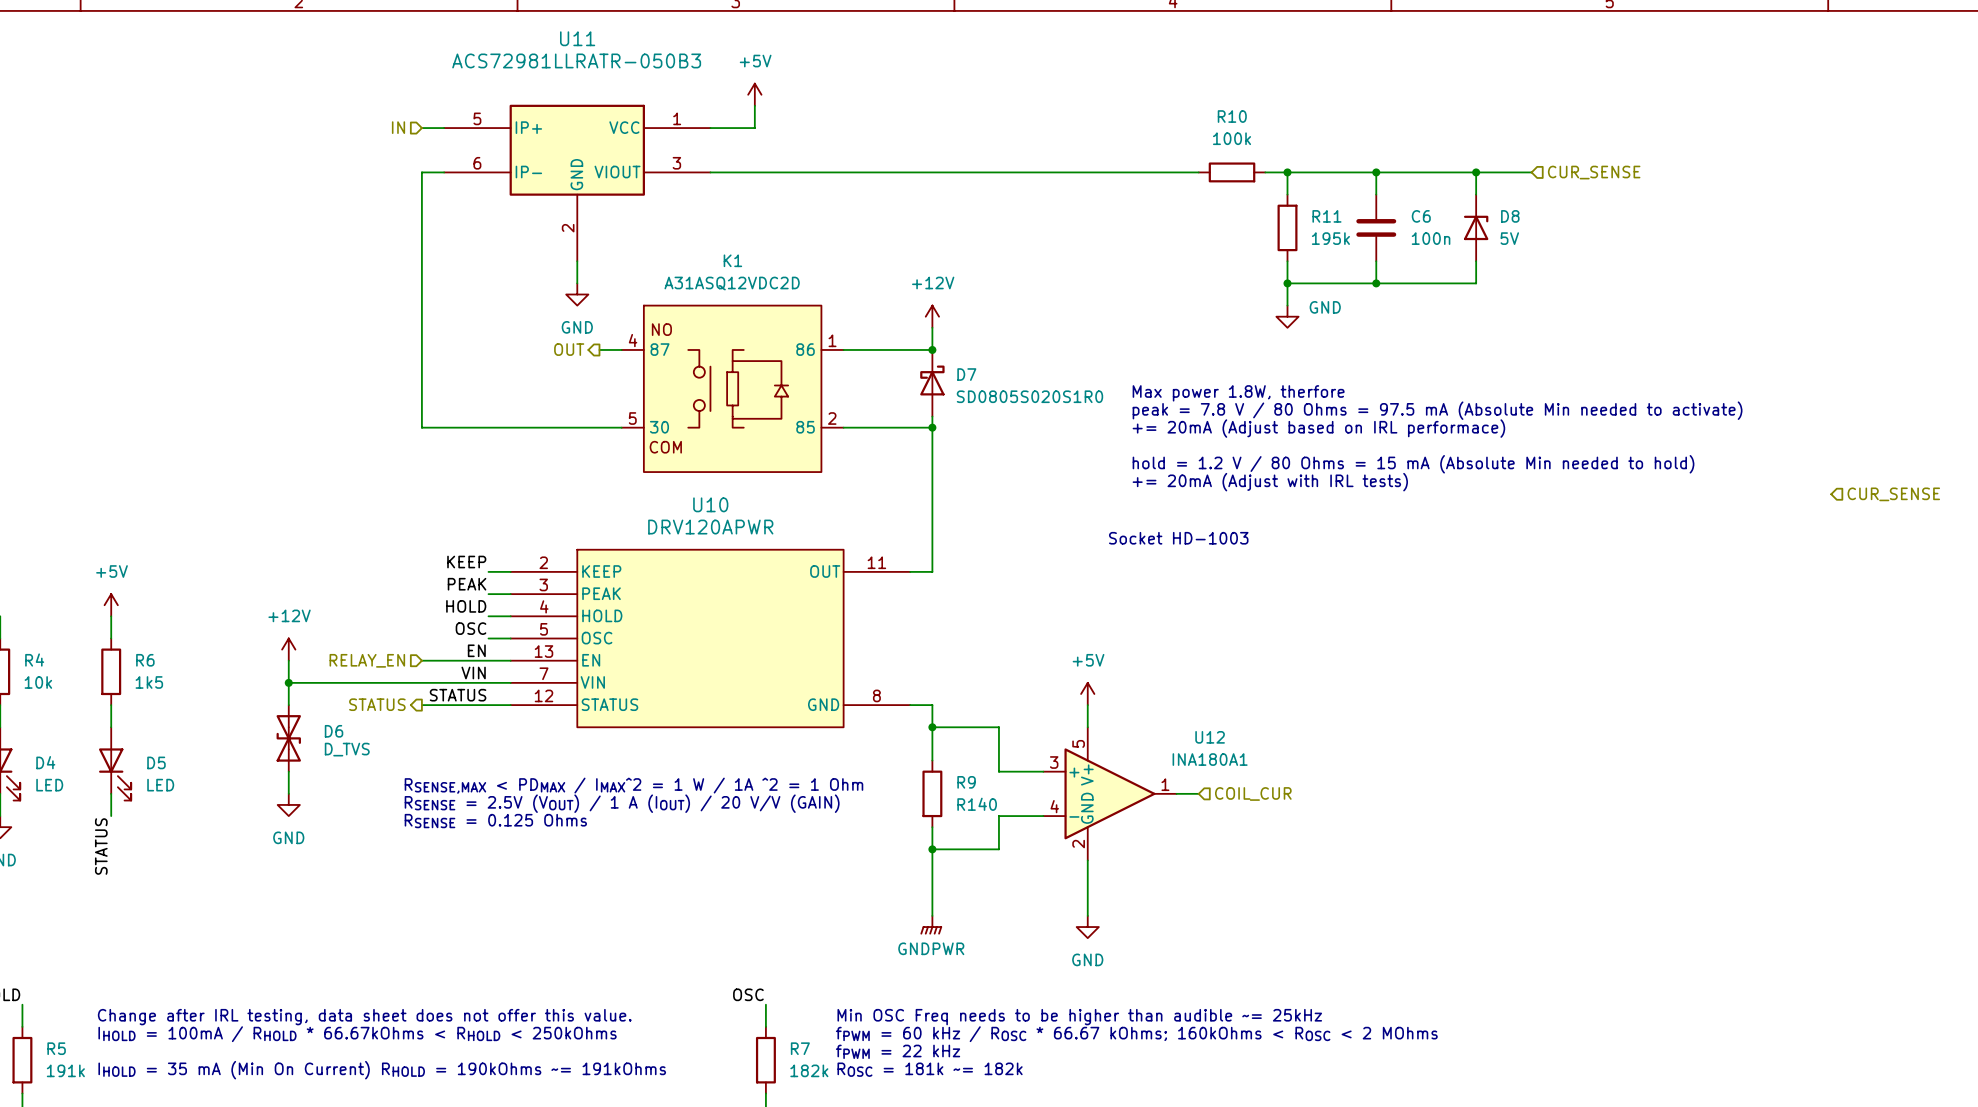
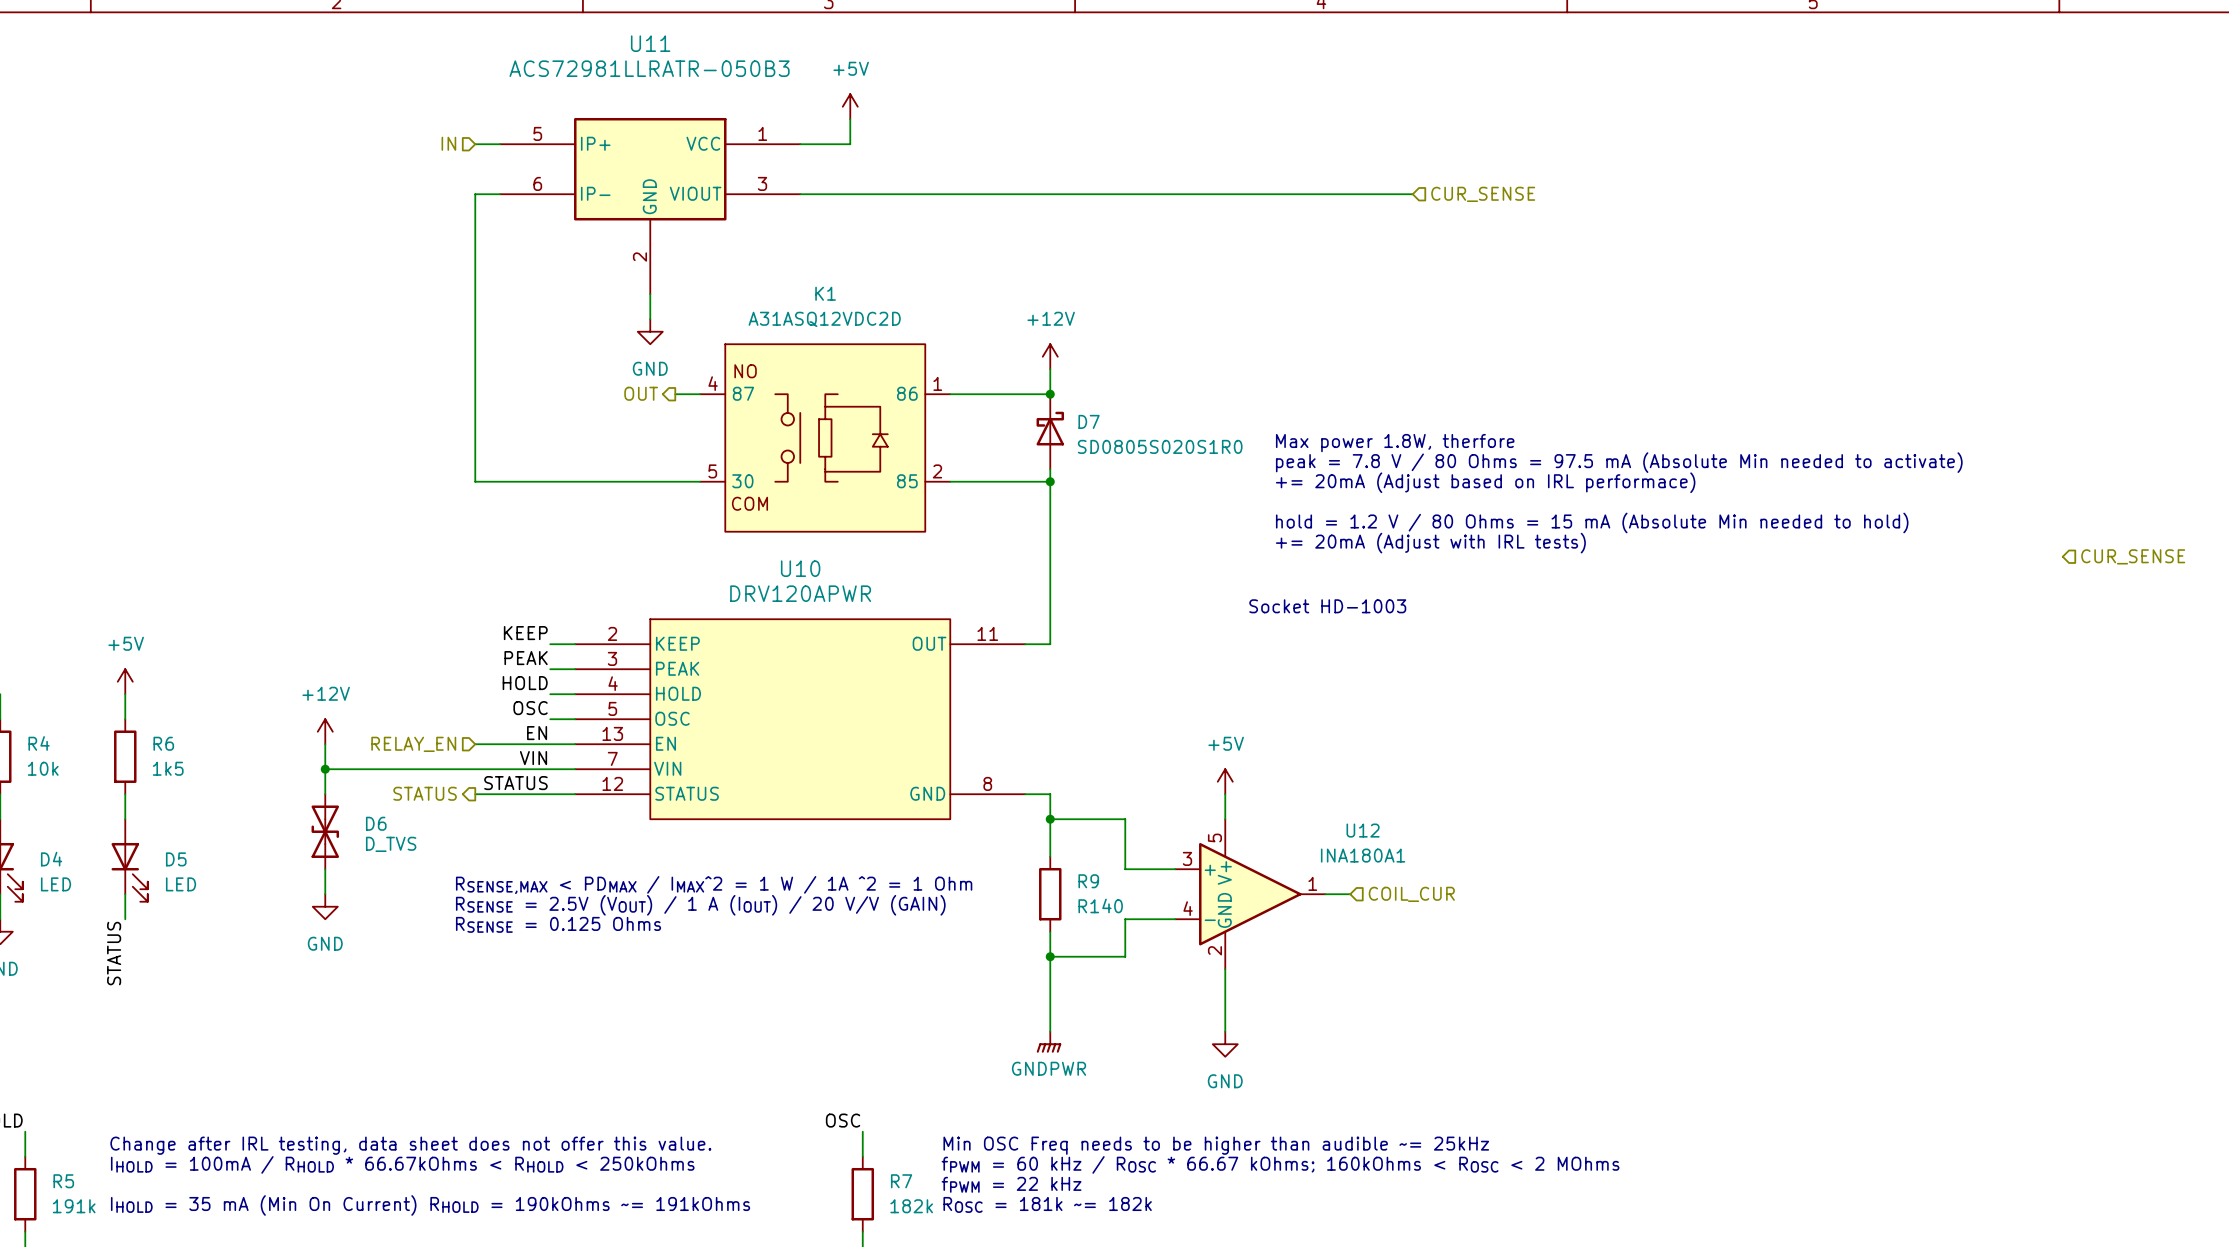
wire: none -> (1350, 194) (1412, 194)
R10: 100k (1232, 172) -> none
wire: (1265, 172) (1531, 172) -> none
wire: (1287, 172) (1287, 194) -> none
junction: (1287, 172) -> none
hierarchical label: none -> CUR_SENSE (1483, 194)
wire: (1376, 172) (1376, 194) -> none
junction: (1376, 172) -> none
wire: (1476, 172) (1476, 194) -> none
junction: (1476, 172) -> none
hierarchical label: CUR_SENSE (1594, 172) -> none
R11: 195k (1287, 227) -> none
C6: 100n (1376, 227) -> none
D8: 5V (1476, 227) -> none
wire: (1287, 261) (1287, 305) -> none
wire: (1376, 261) (1376, 283) -> none
wire: (1476, 261) (1476, 283) (1287, 283) -> none
junction: (1287, 283) -> none
junction: (1376, 283) -> none
power symbol: GND (1287, 316) -> none

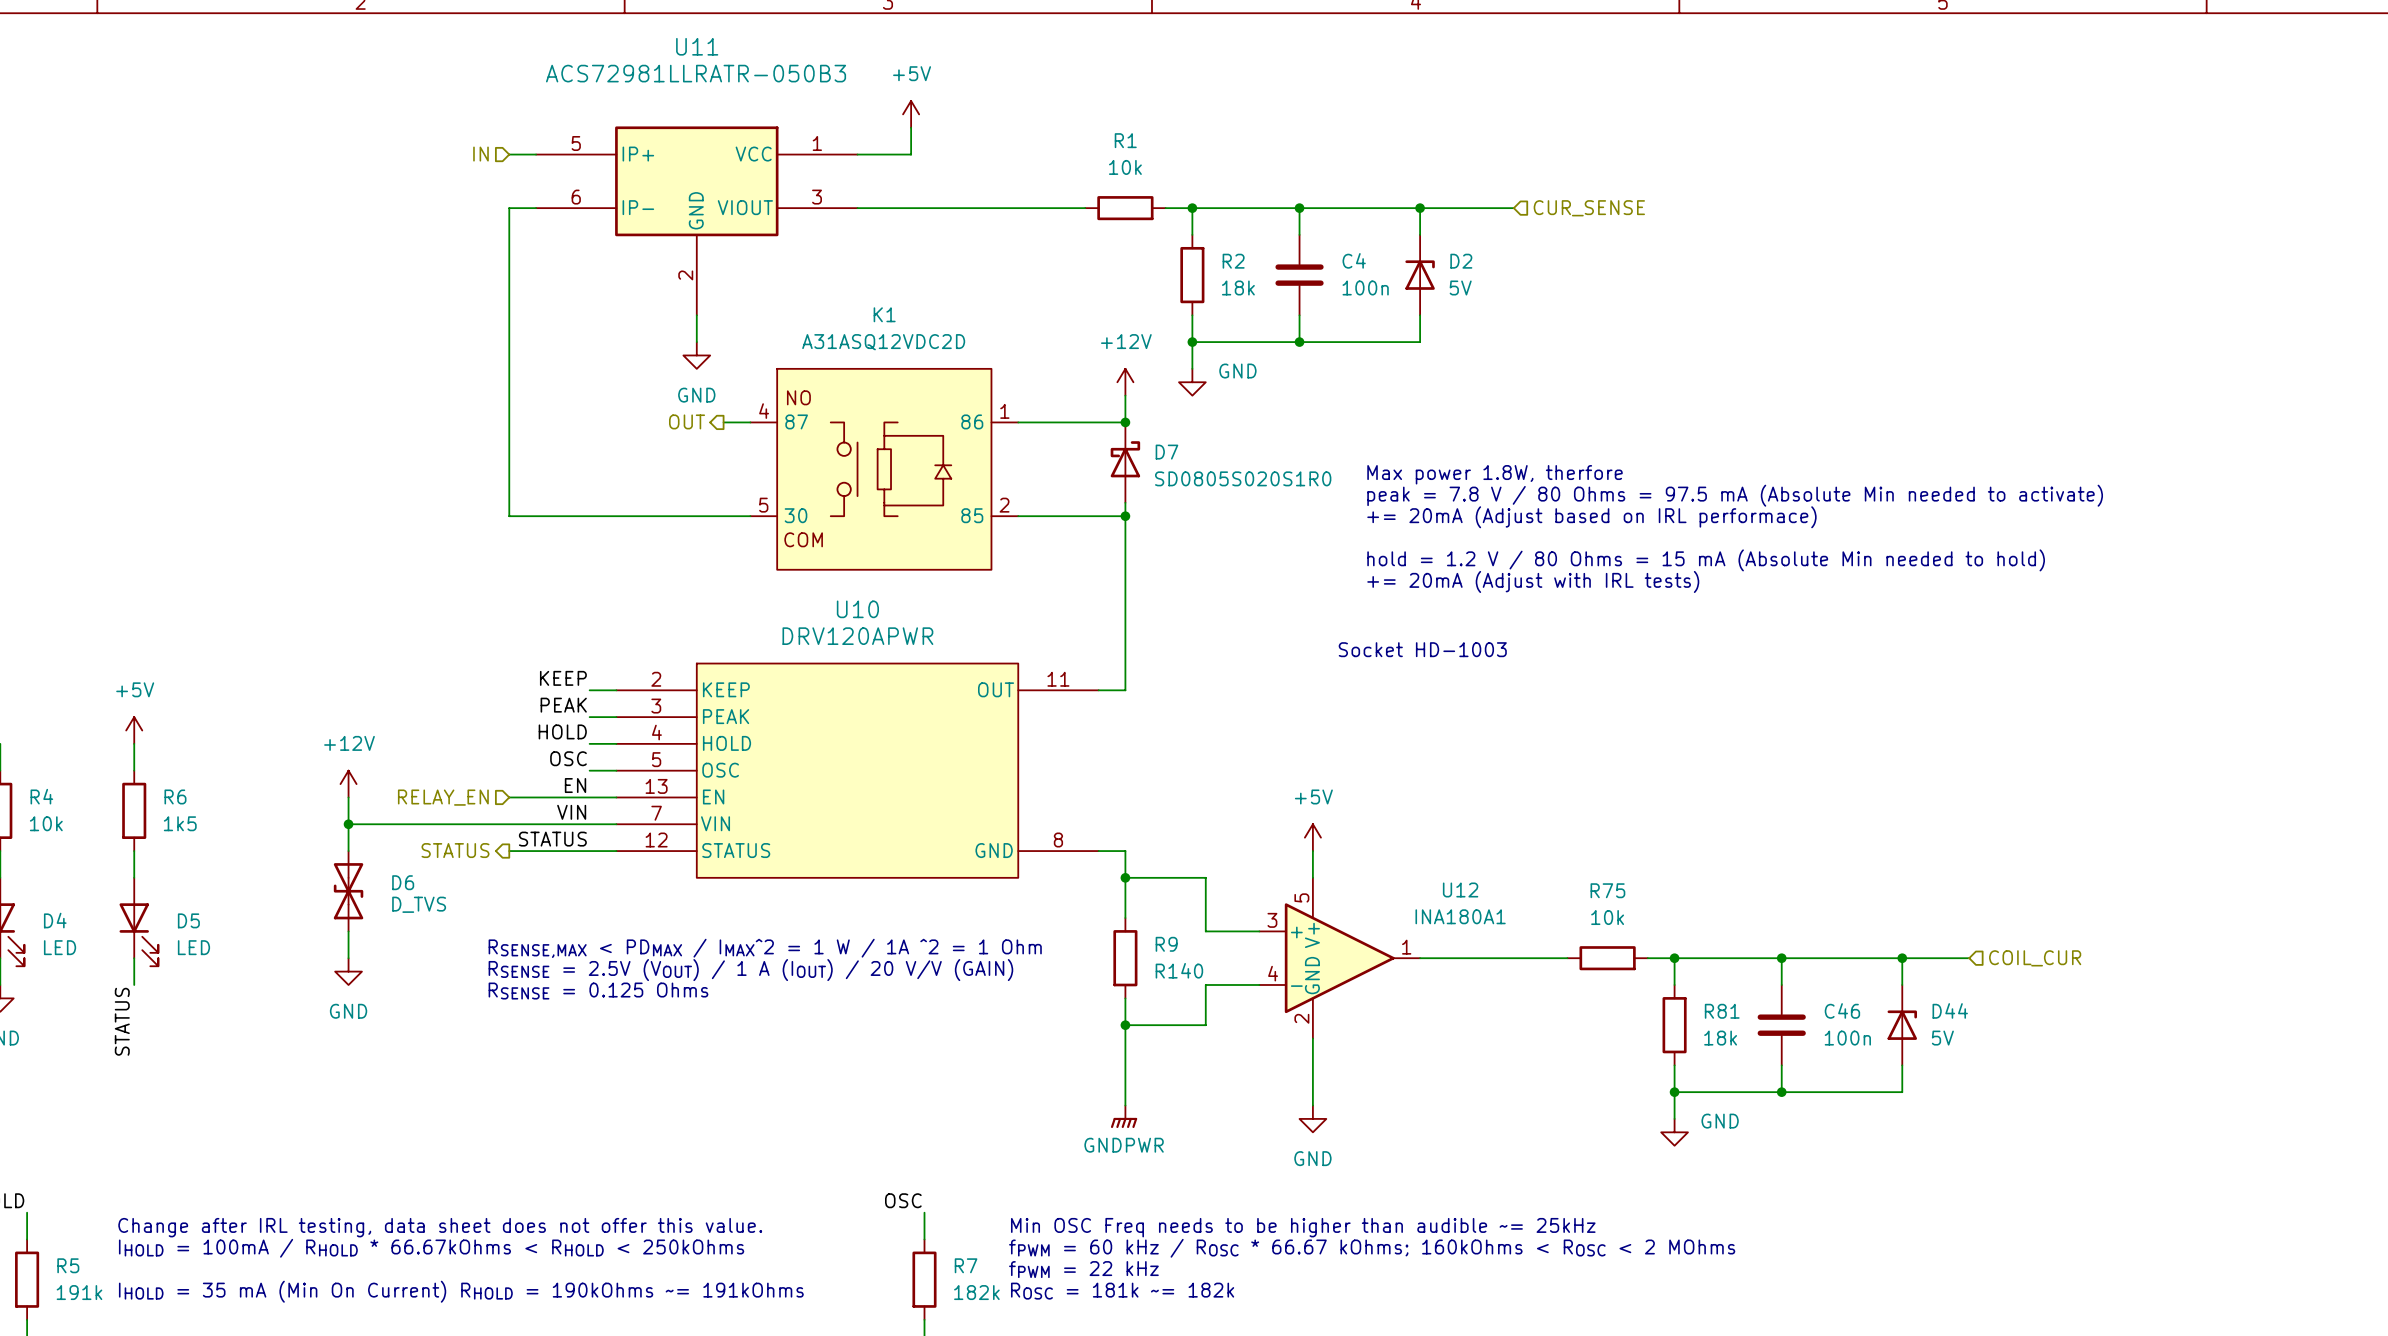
wire: (1012, 194) (1087, 194) -> none
R1: none -> 10k (1125, 208)
wire: none -> (1192, 208) (1192, 234)
junction: none -> (1192, 208)
wire: none -> (1299, 208) (1299, 234)
junction: none -> (1299, 208)
wire: none -> (1420, 208) (1420, 234)
junction: none -> (1420, 208)
R2: none -> 18k (1192, 275)
C4: none -> 100n (1299, 275)
D2: none -> 5V (1420, 275)
wire: none -> (1192, 315) (1192, 368)
wire: none -> (1299, 315) (1299, 342)
wire: none -> (1420, 315) (1420, 342) (1192, 342)
junction: none -> (1192, 342)
junction: none -> (1299, 342)
power symbol: none -> GND (1192, 382)
hierarchical label: CUR_SENSE (2133, 556) -> none
wire: none -> (1446, 958) (1567, 958)
hierarchical label: COIL_CUR (1411, 894) -> none
R75: none -> 10k (1607, 958)
wire: none -> (1647, 958) (1969, 958)
wire: none -> (1674, 958) (1674, 984)
junction: none -> (1674, 958)
wire: none -> (1781, 958) (1781, 984)
junction: none -> (1781, 958)
wire: none -> (1902, 958) (1902, 984)
junction: none -> (1902, 958)
hierarchical label: none -> COIL_CUR (2035, 958)
R81: none -> 18k (1674, 1025)
C46: none -> 100n (1781, 1025)
D44: none -> 5V (1902, 1025)
wire: none -> (1674, 1065) (1674, 1118)
wire: none -> (1781, 1065) (1781, 1092)
wire: none -> (1902, 1065) (1902, 1092) (1674, 1092)
junction: none -> (1674, 1092)
junction: none -> (1781, 1092)
power symbol: none -> GND (1674, 1132)

